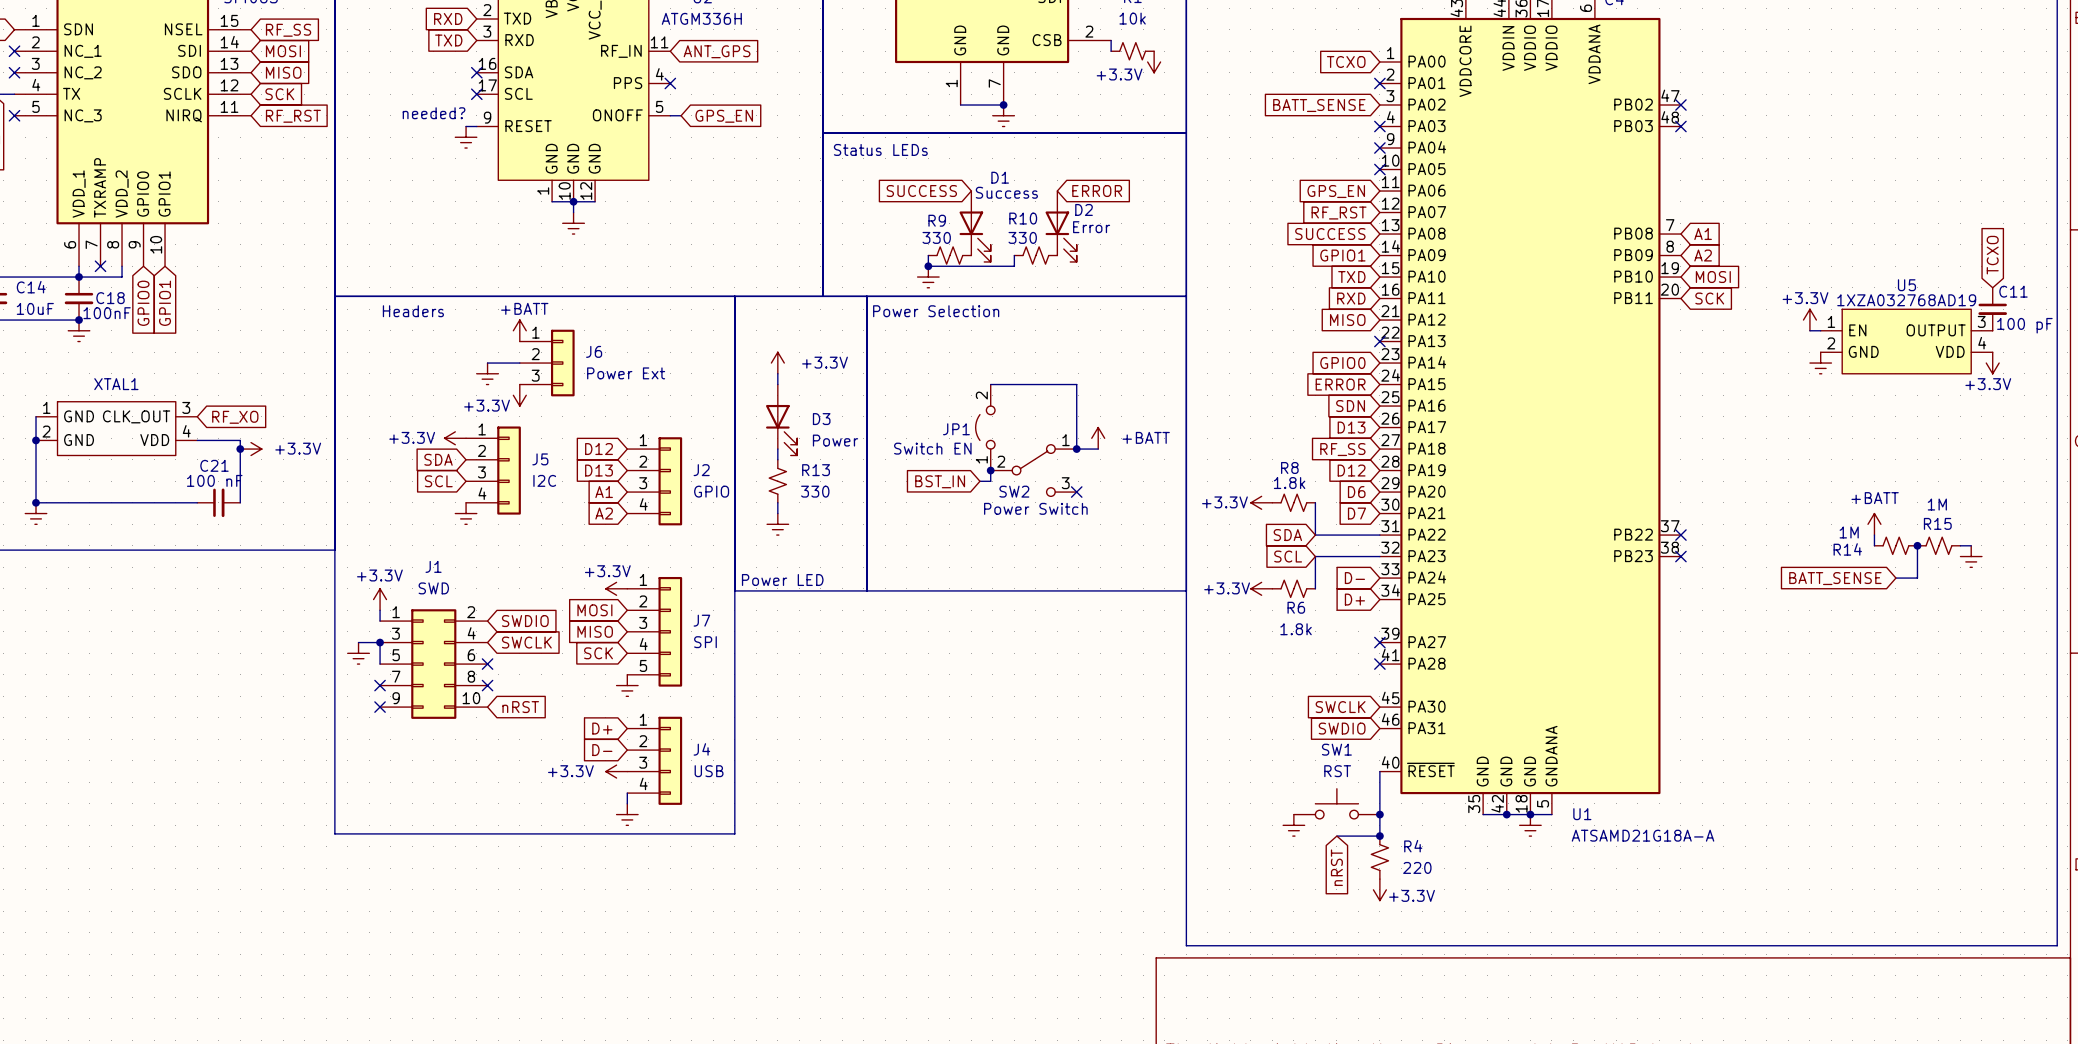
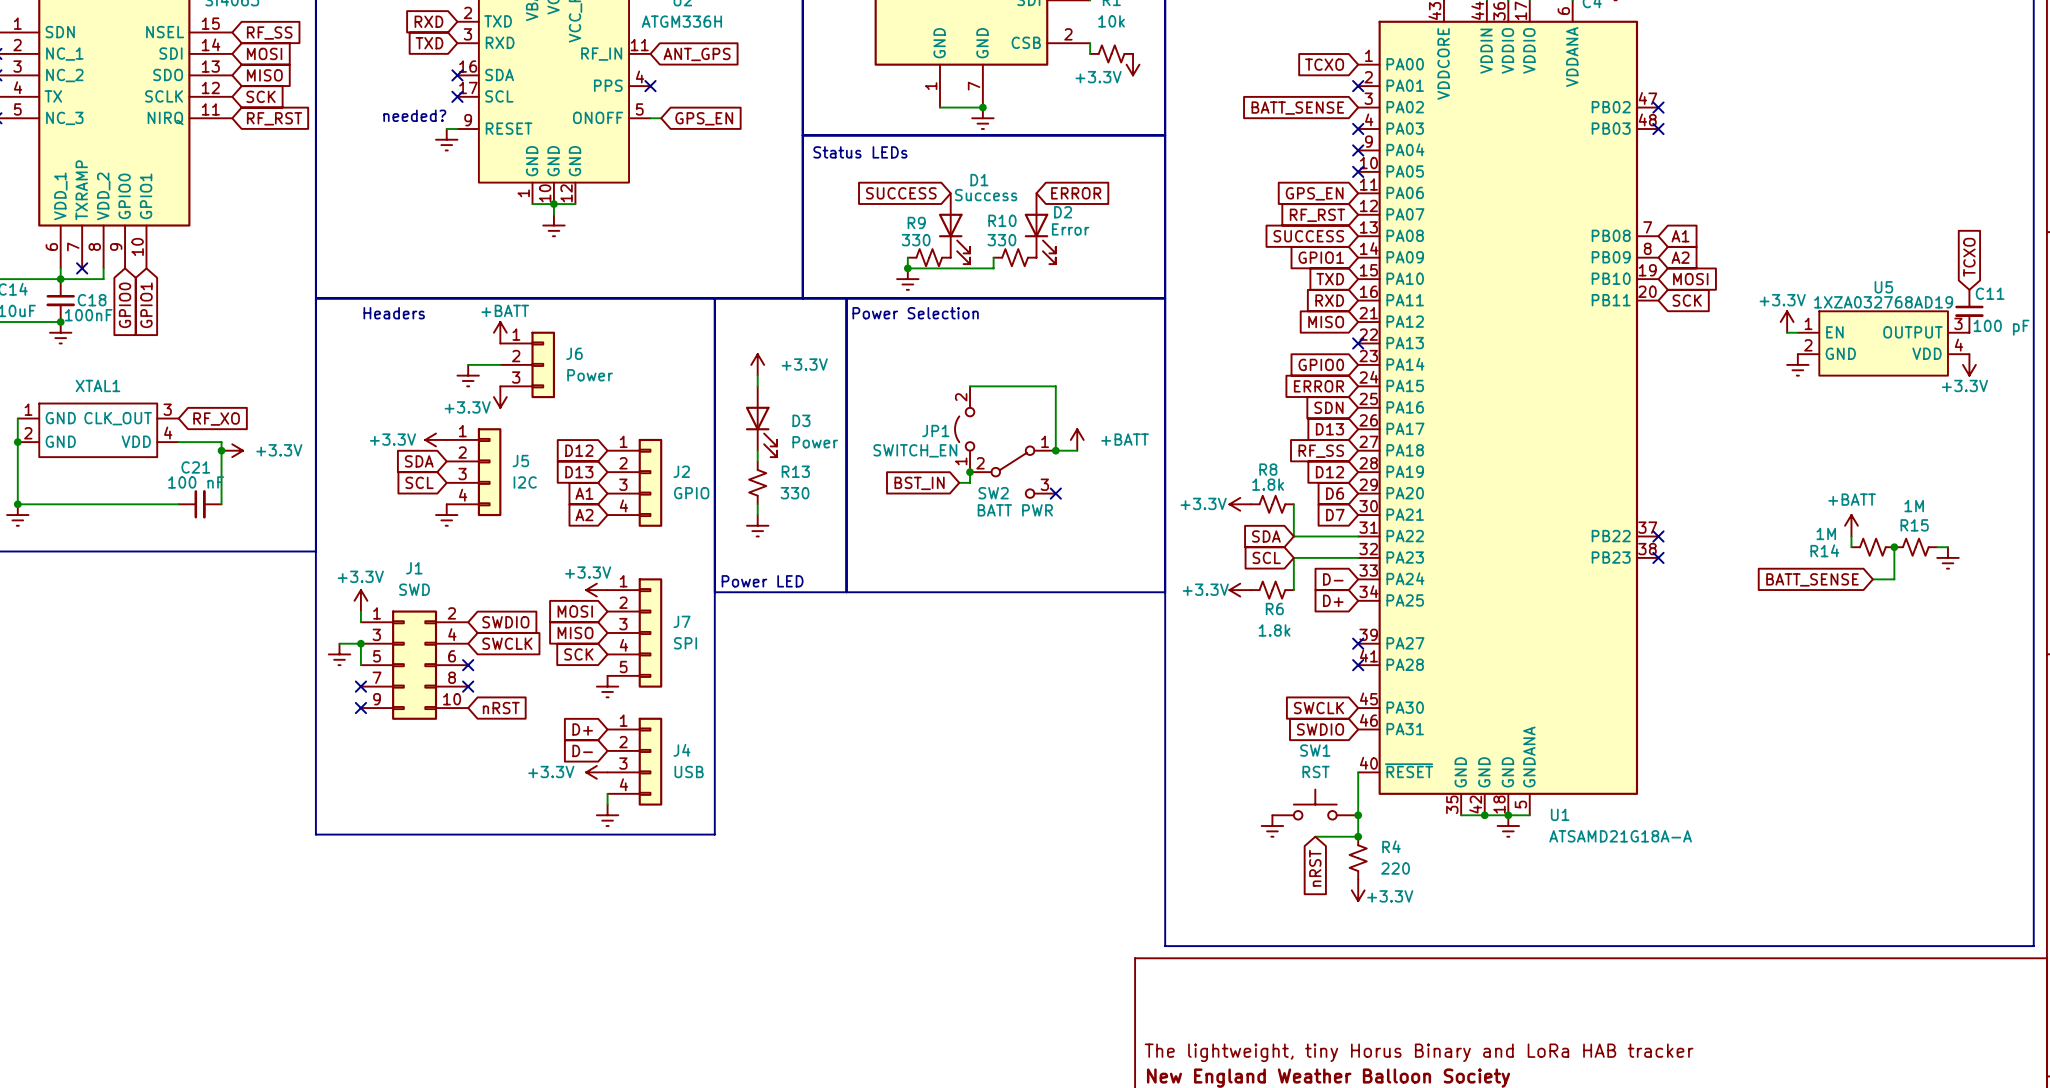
J6 value: Power Ext (626, 373) -> Power (590, 375)
JP1 value: Switch EN (932, 448) -> SWITCH_EN (915, 450)
SW2 value: Power Switch (1035, 508) -> BATT PWR (1015, 510)

